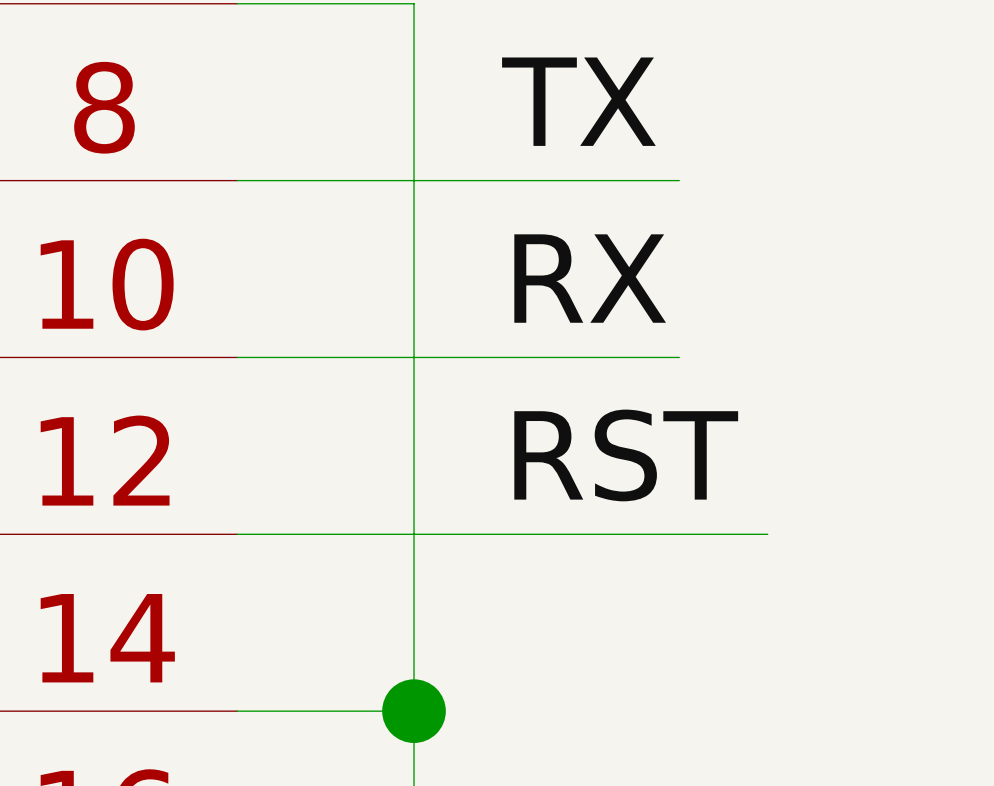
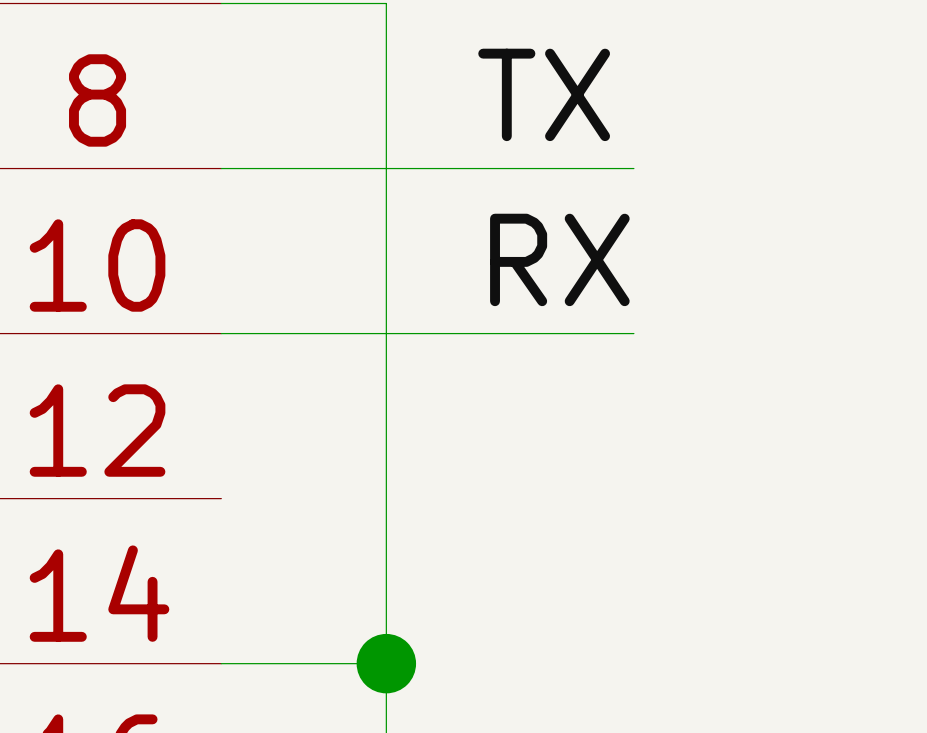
label: RST (626, 455) -> none
wire: (237, 534) (767, 534) -> none

